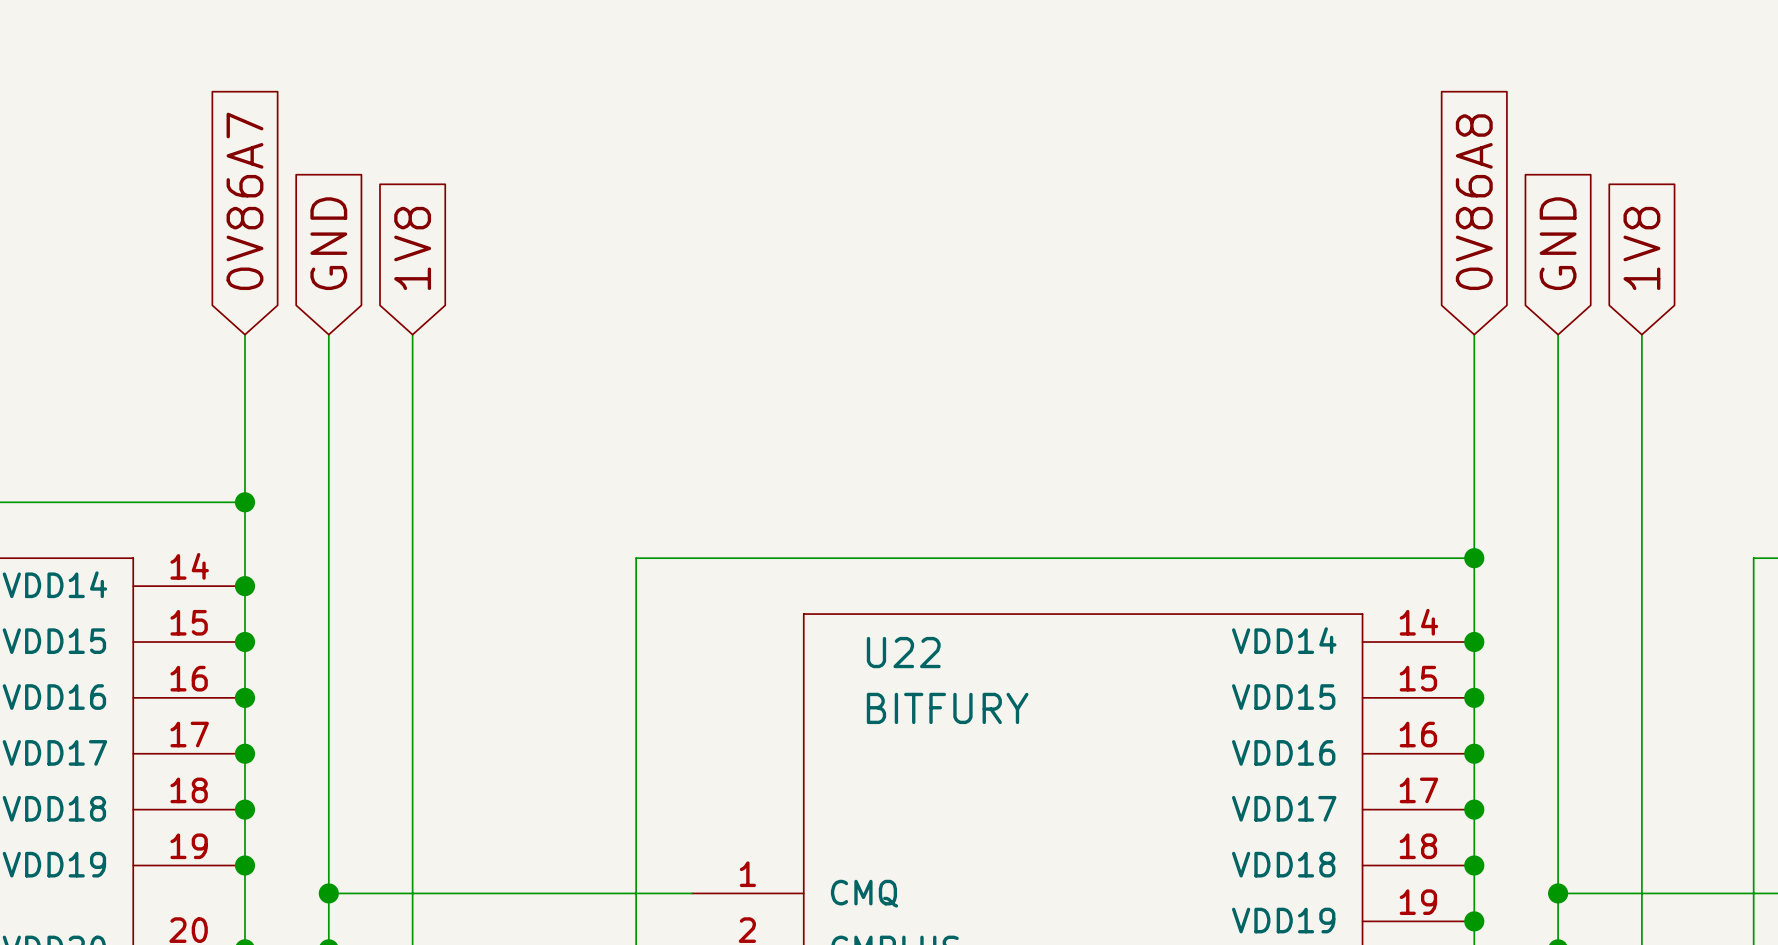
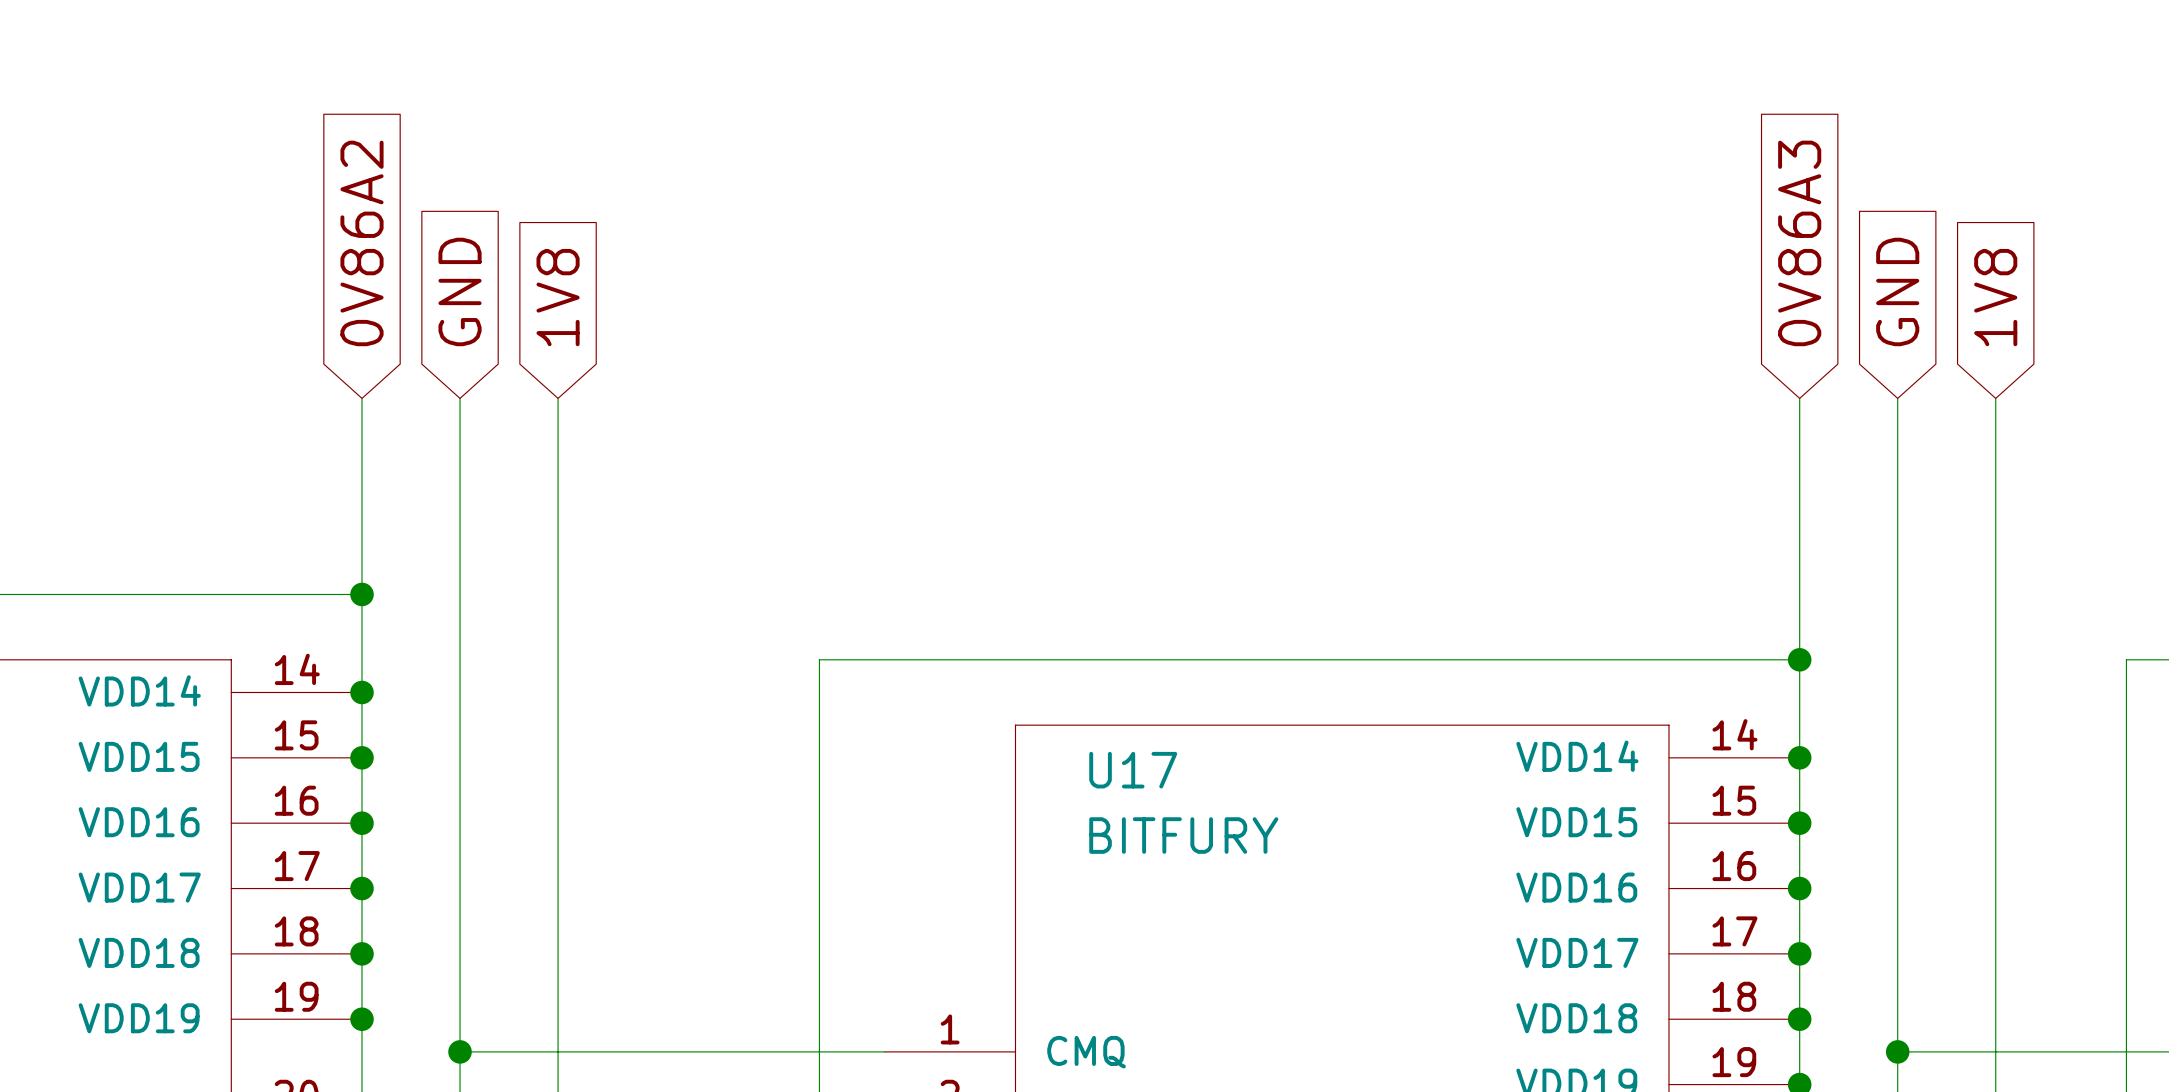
global label: 0V86A7 (244, 201) -> 0V86A2 (362, 243)
global label: 0V86A8 (1474, 202) -> 0V86A3 (1799, 243)
U22 name: U22 (903, 652) -> U17 (1133, 770)

